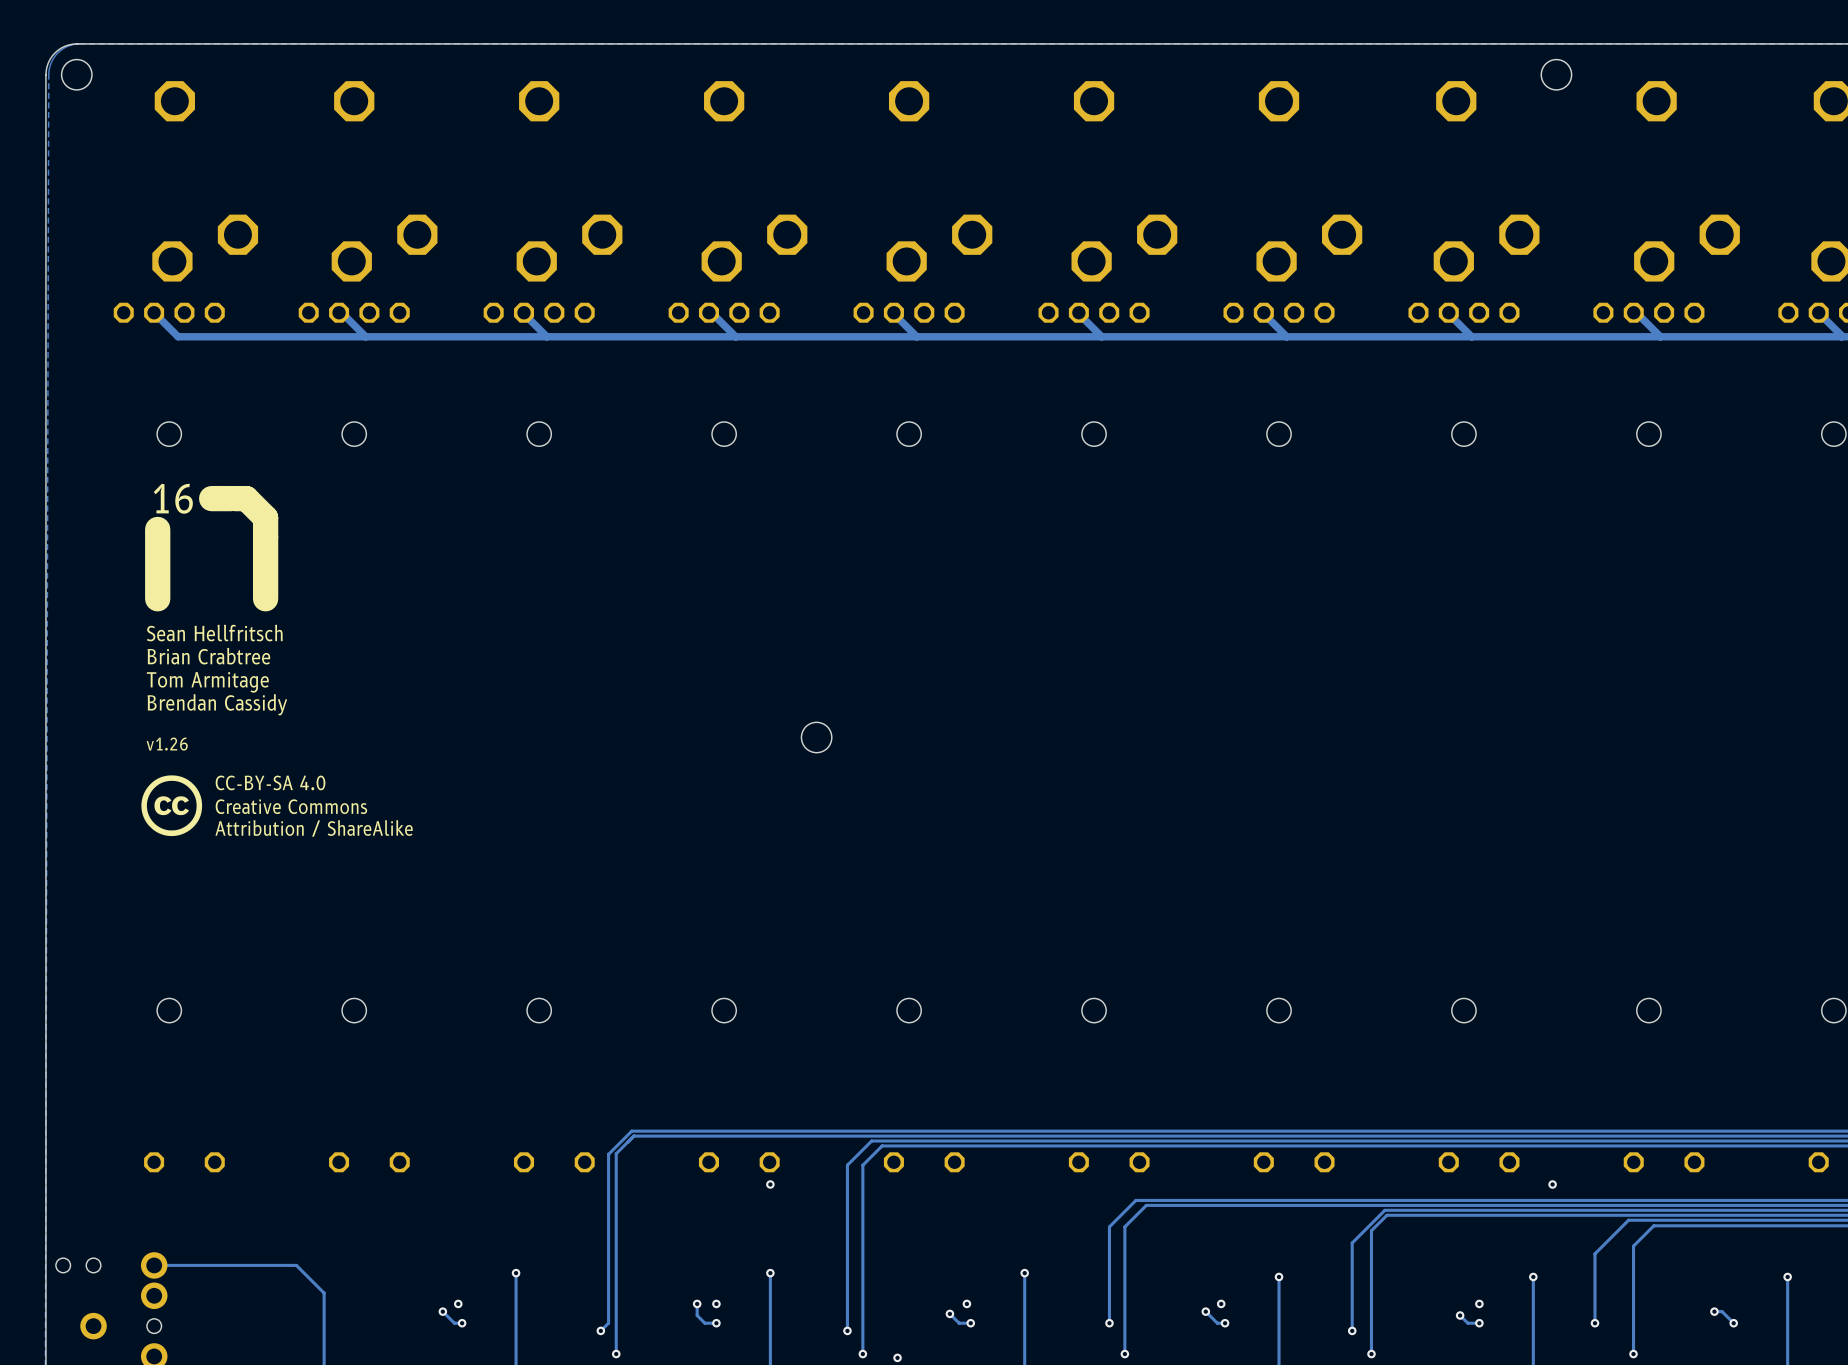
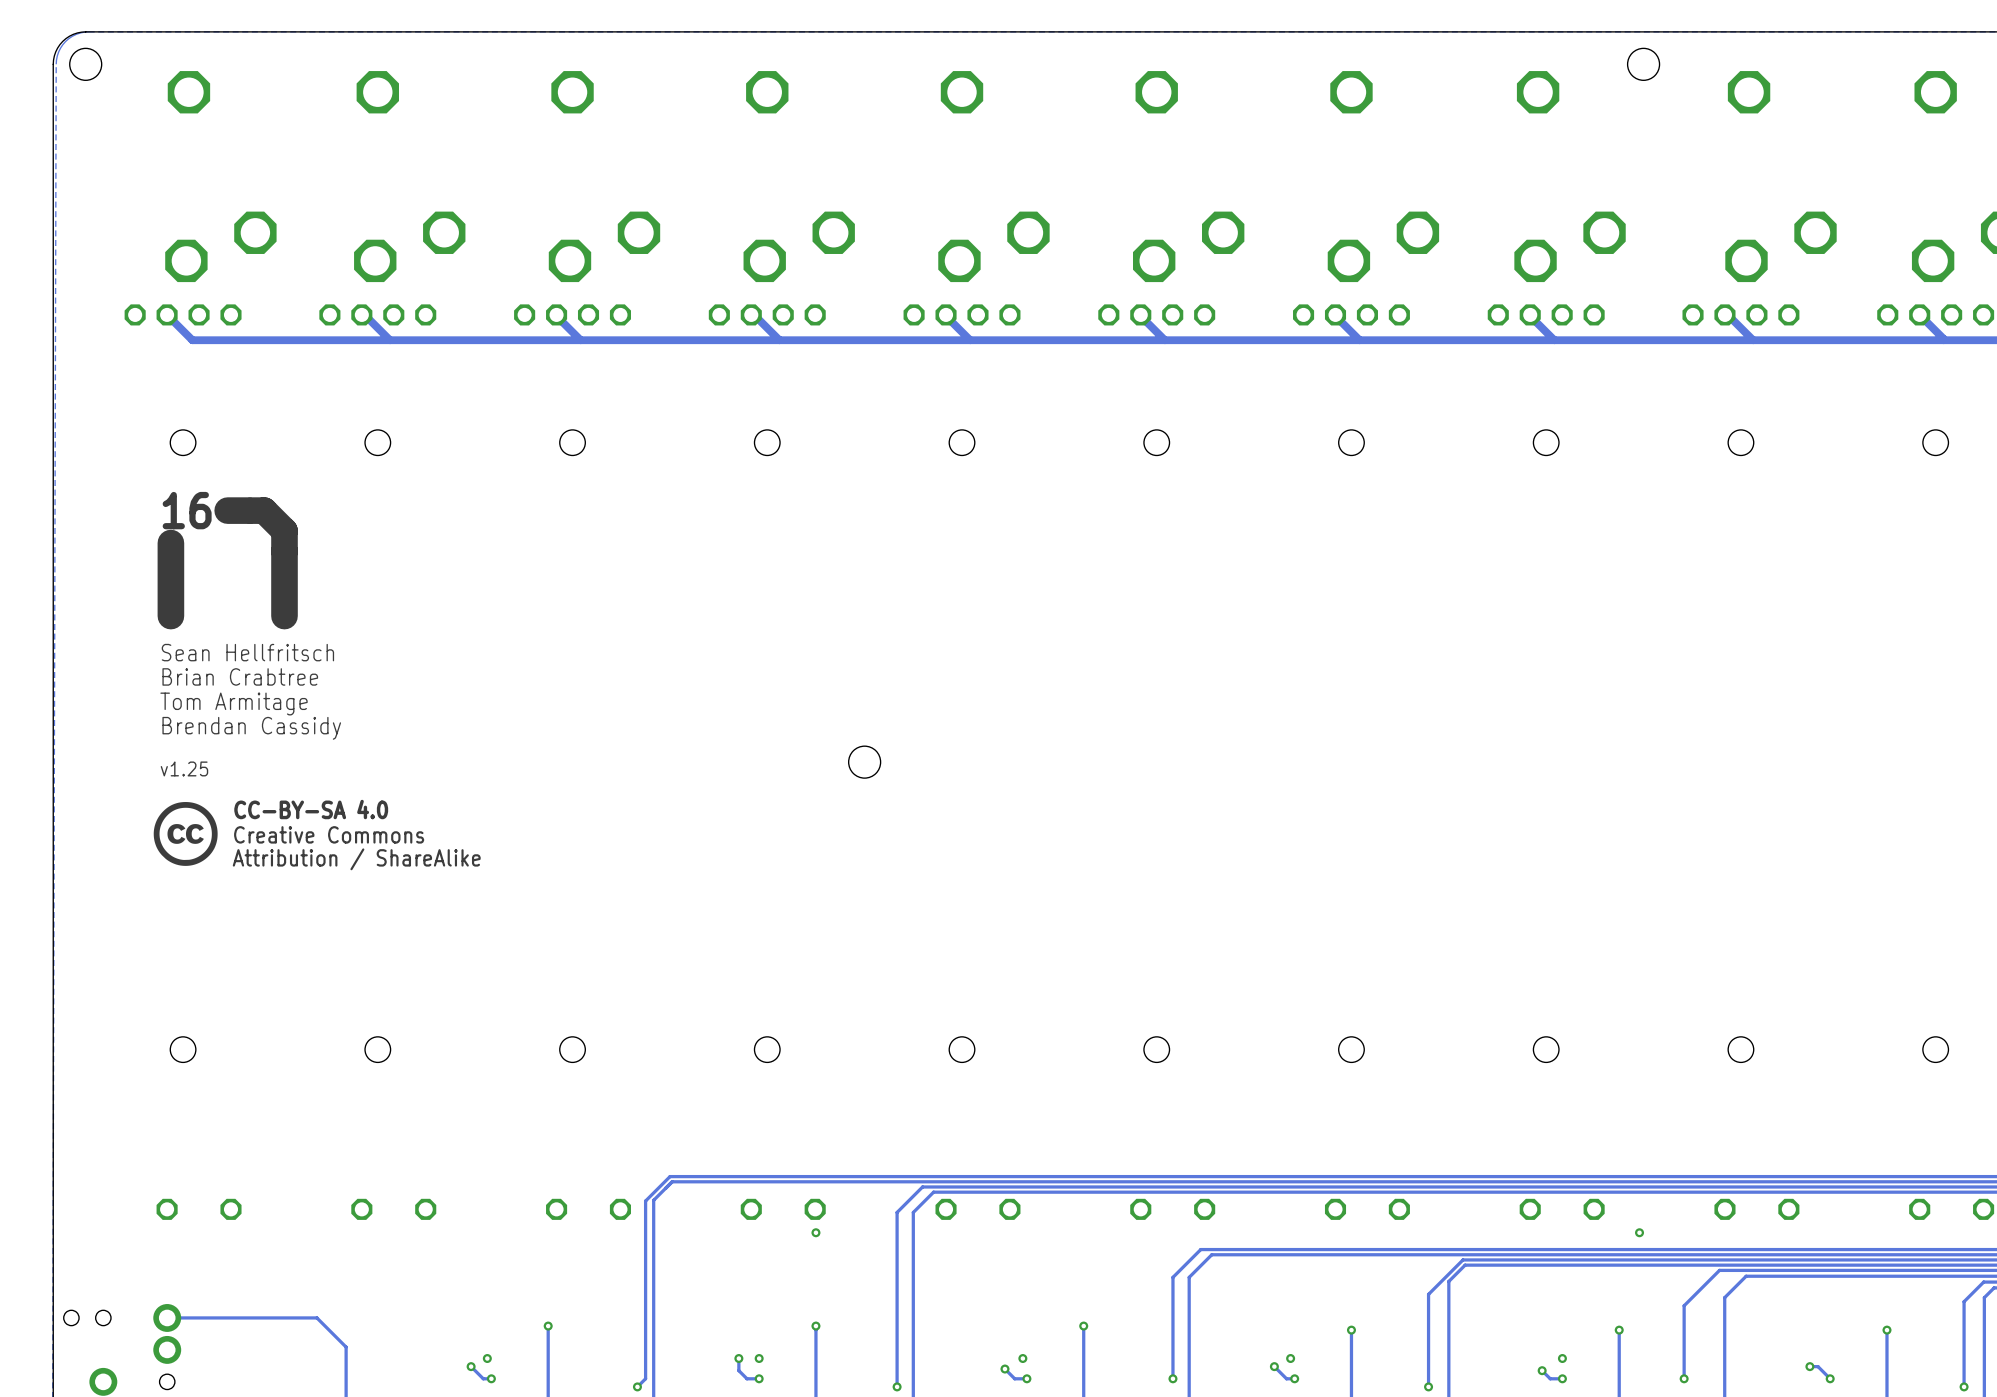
text: v1.26 (167, 744) -> v1.25 (184, 768)

